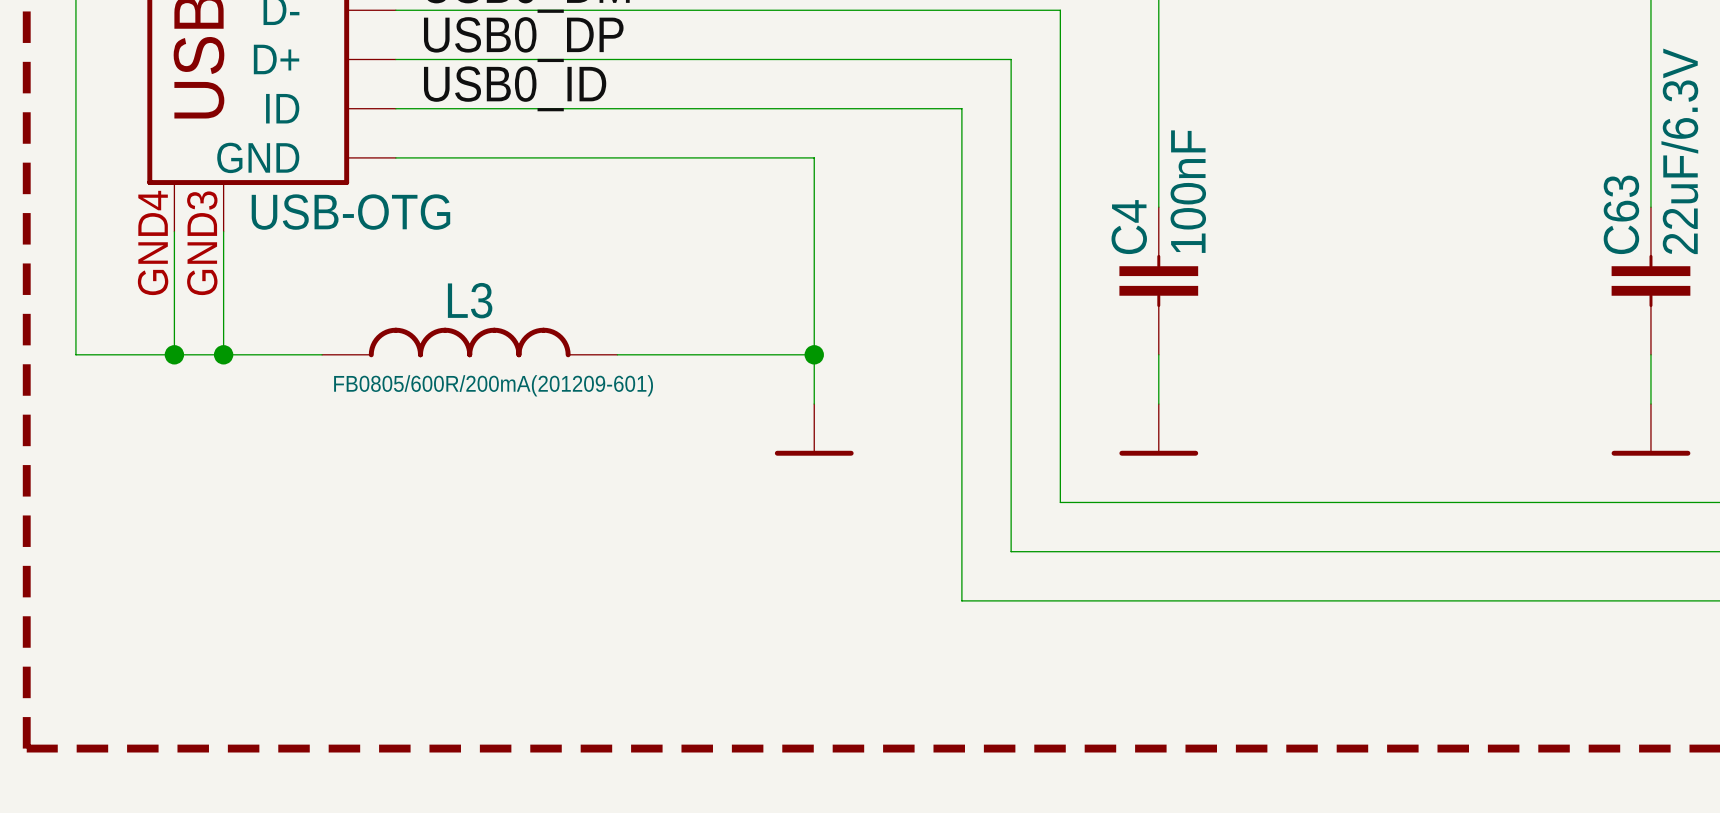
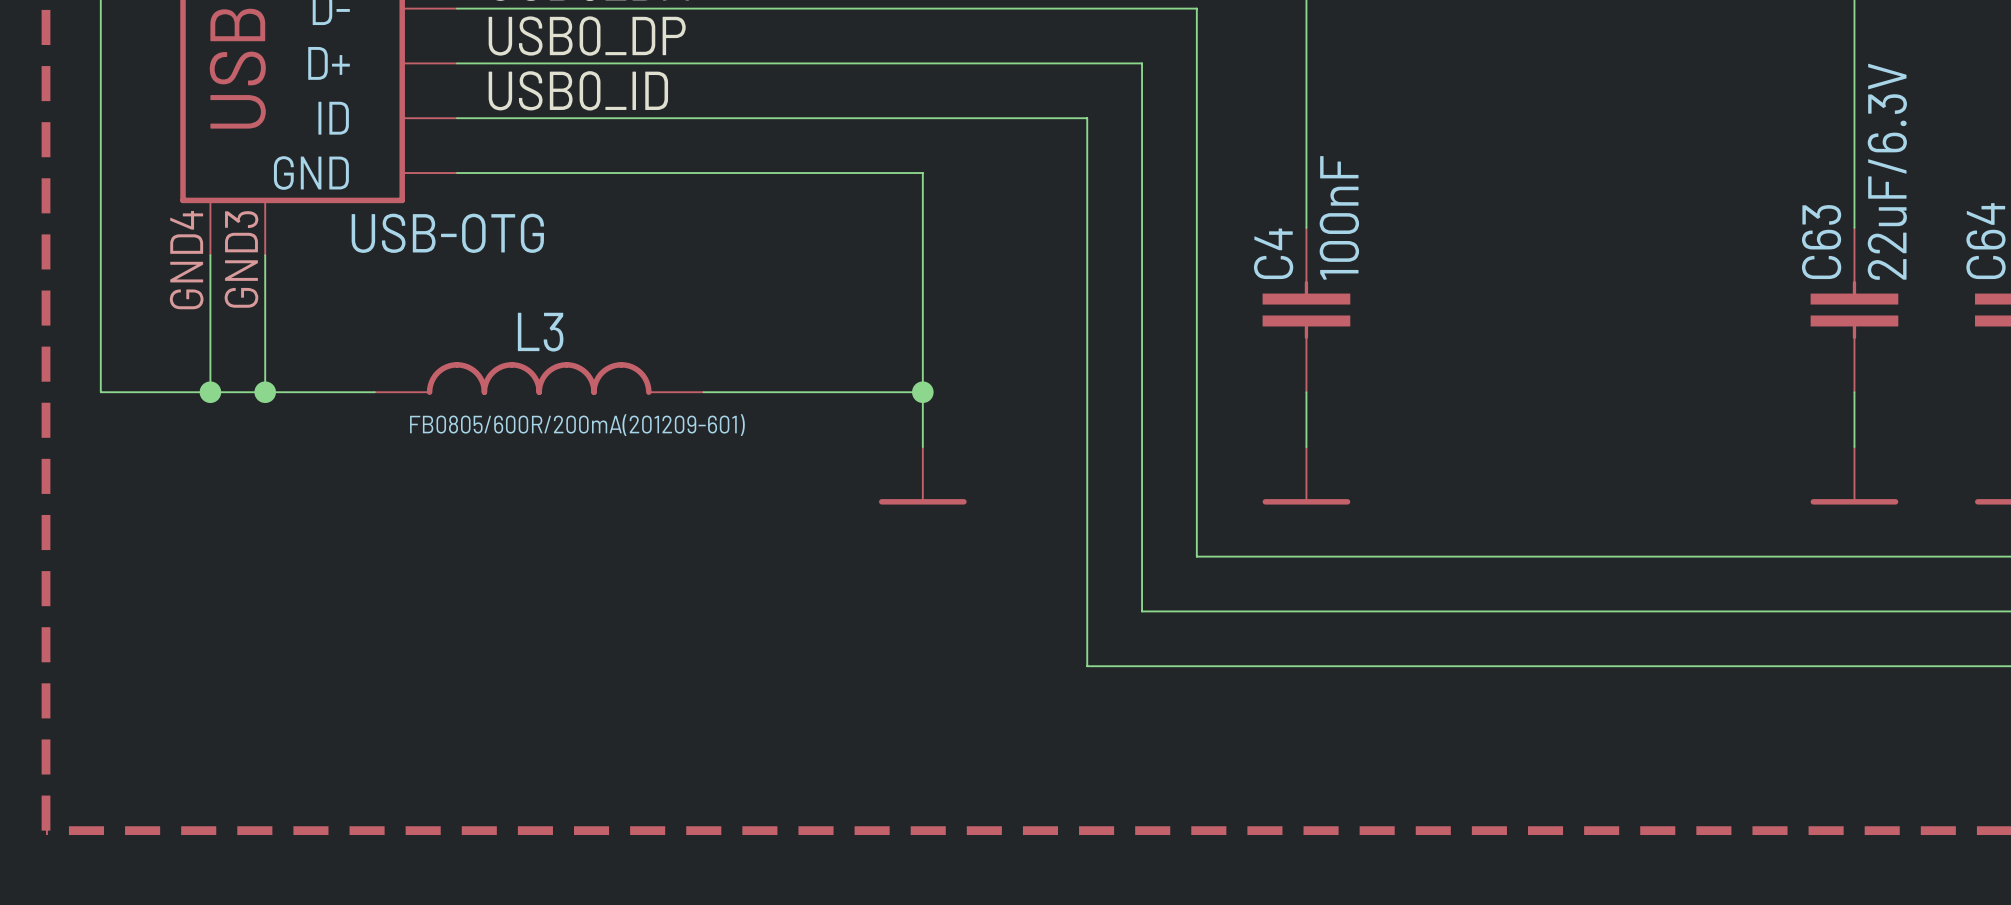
part value position: USB-OTG (350, 212) -> USB-OTG (447, 233)

